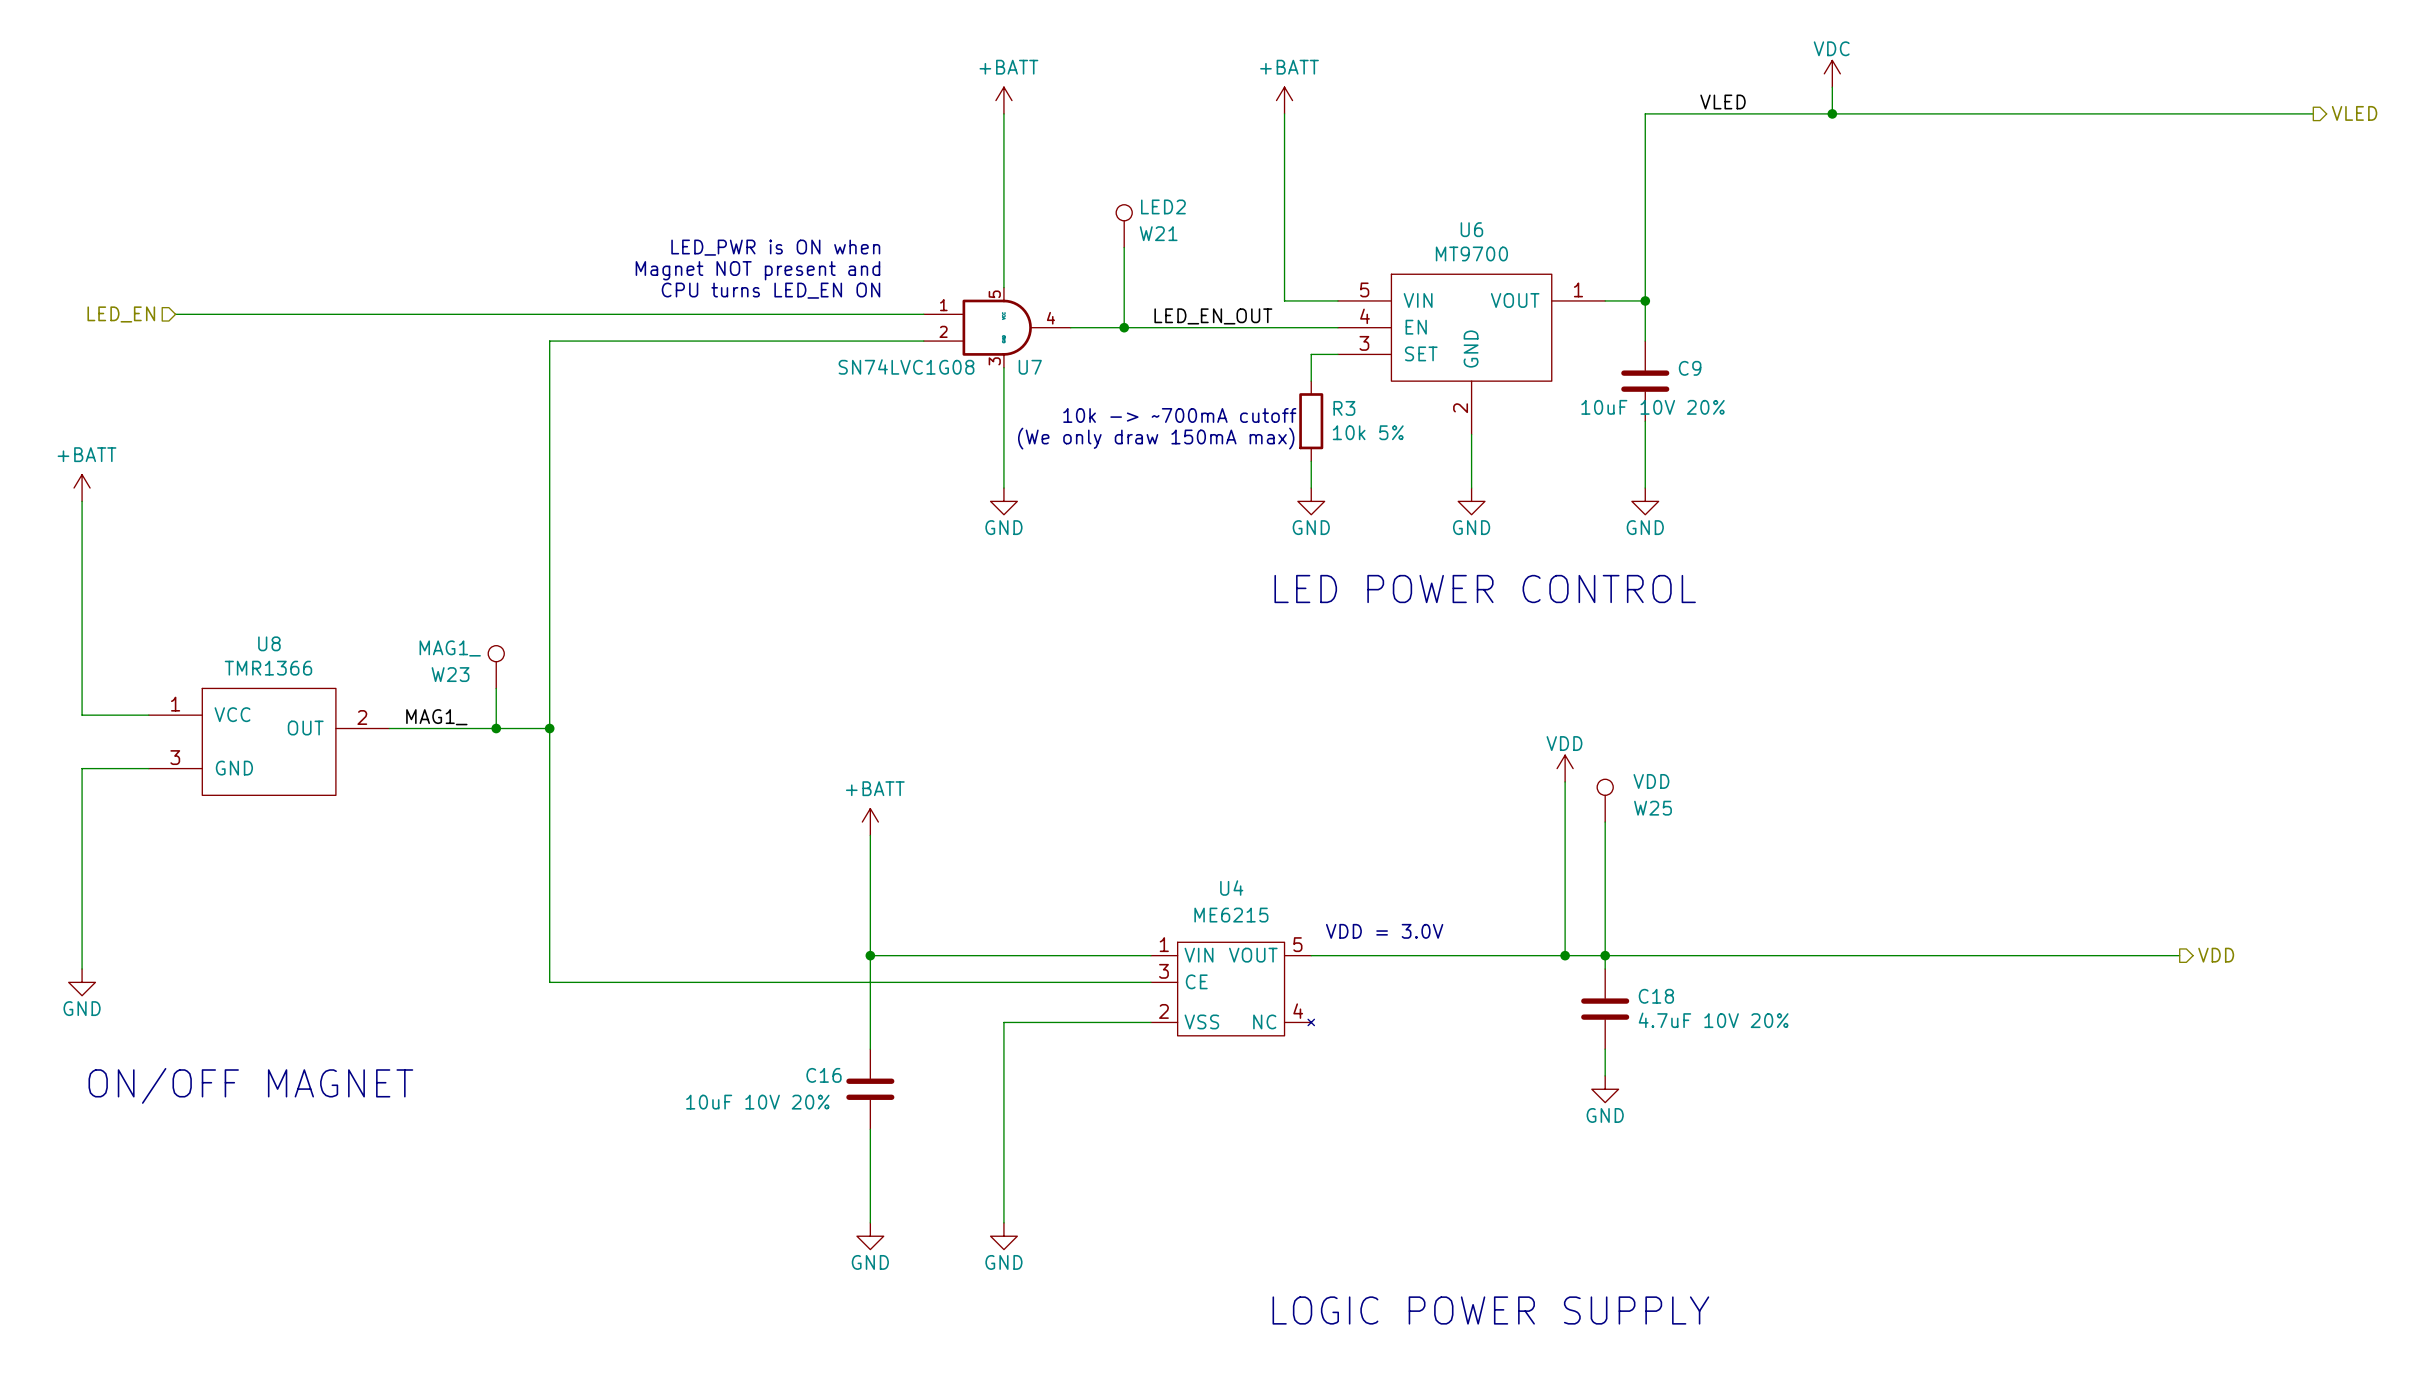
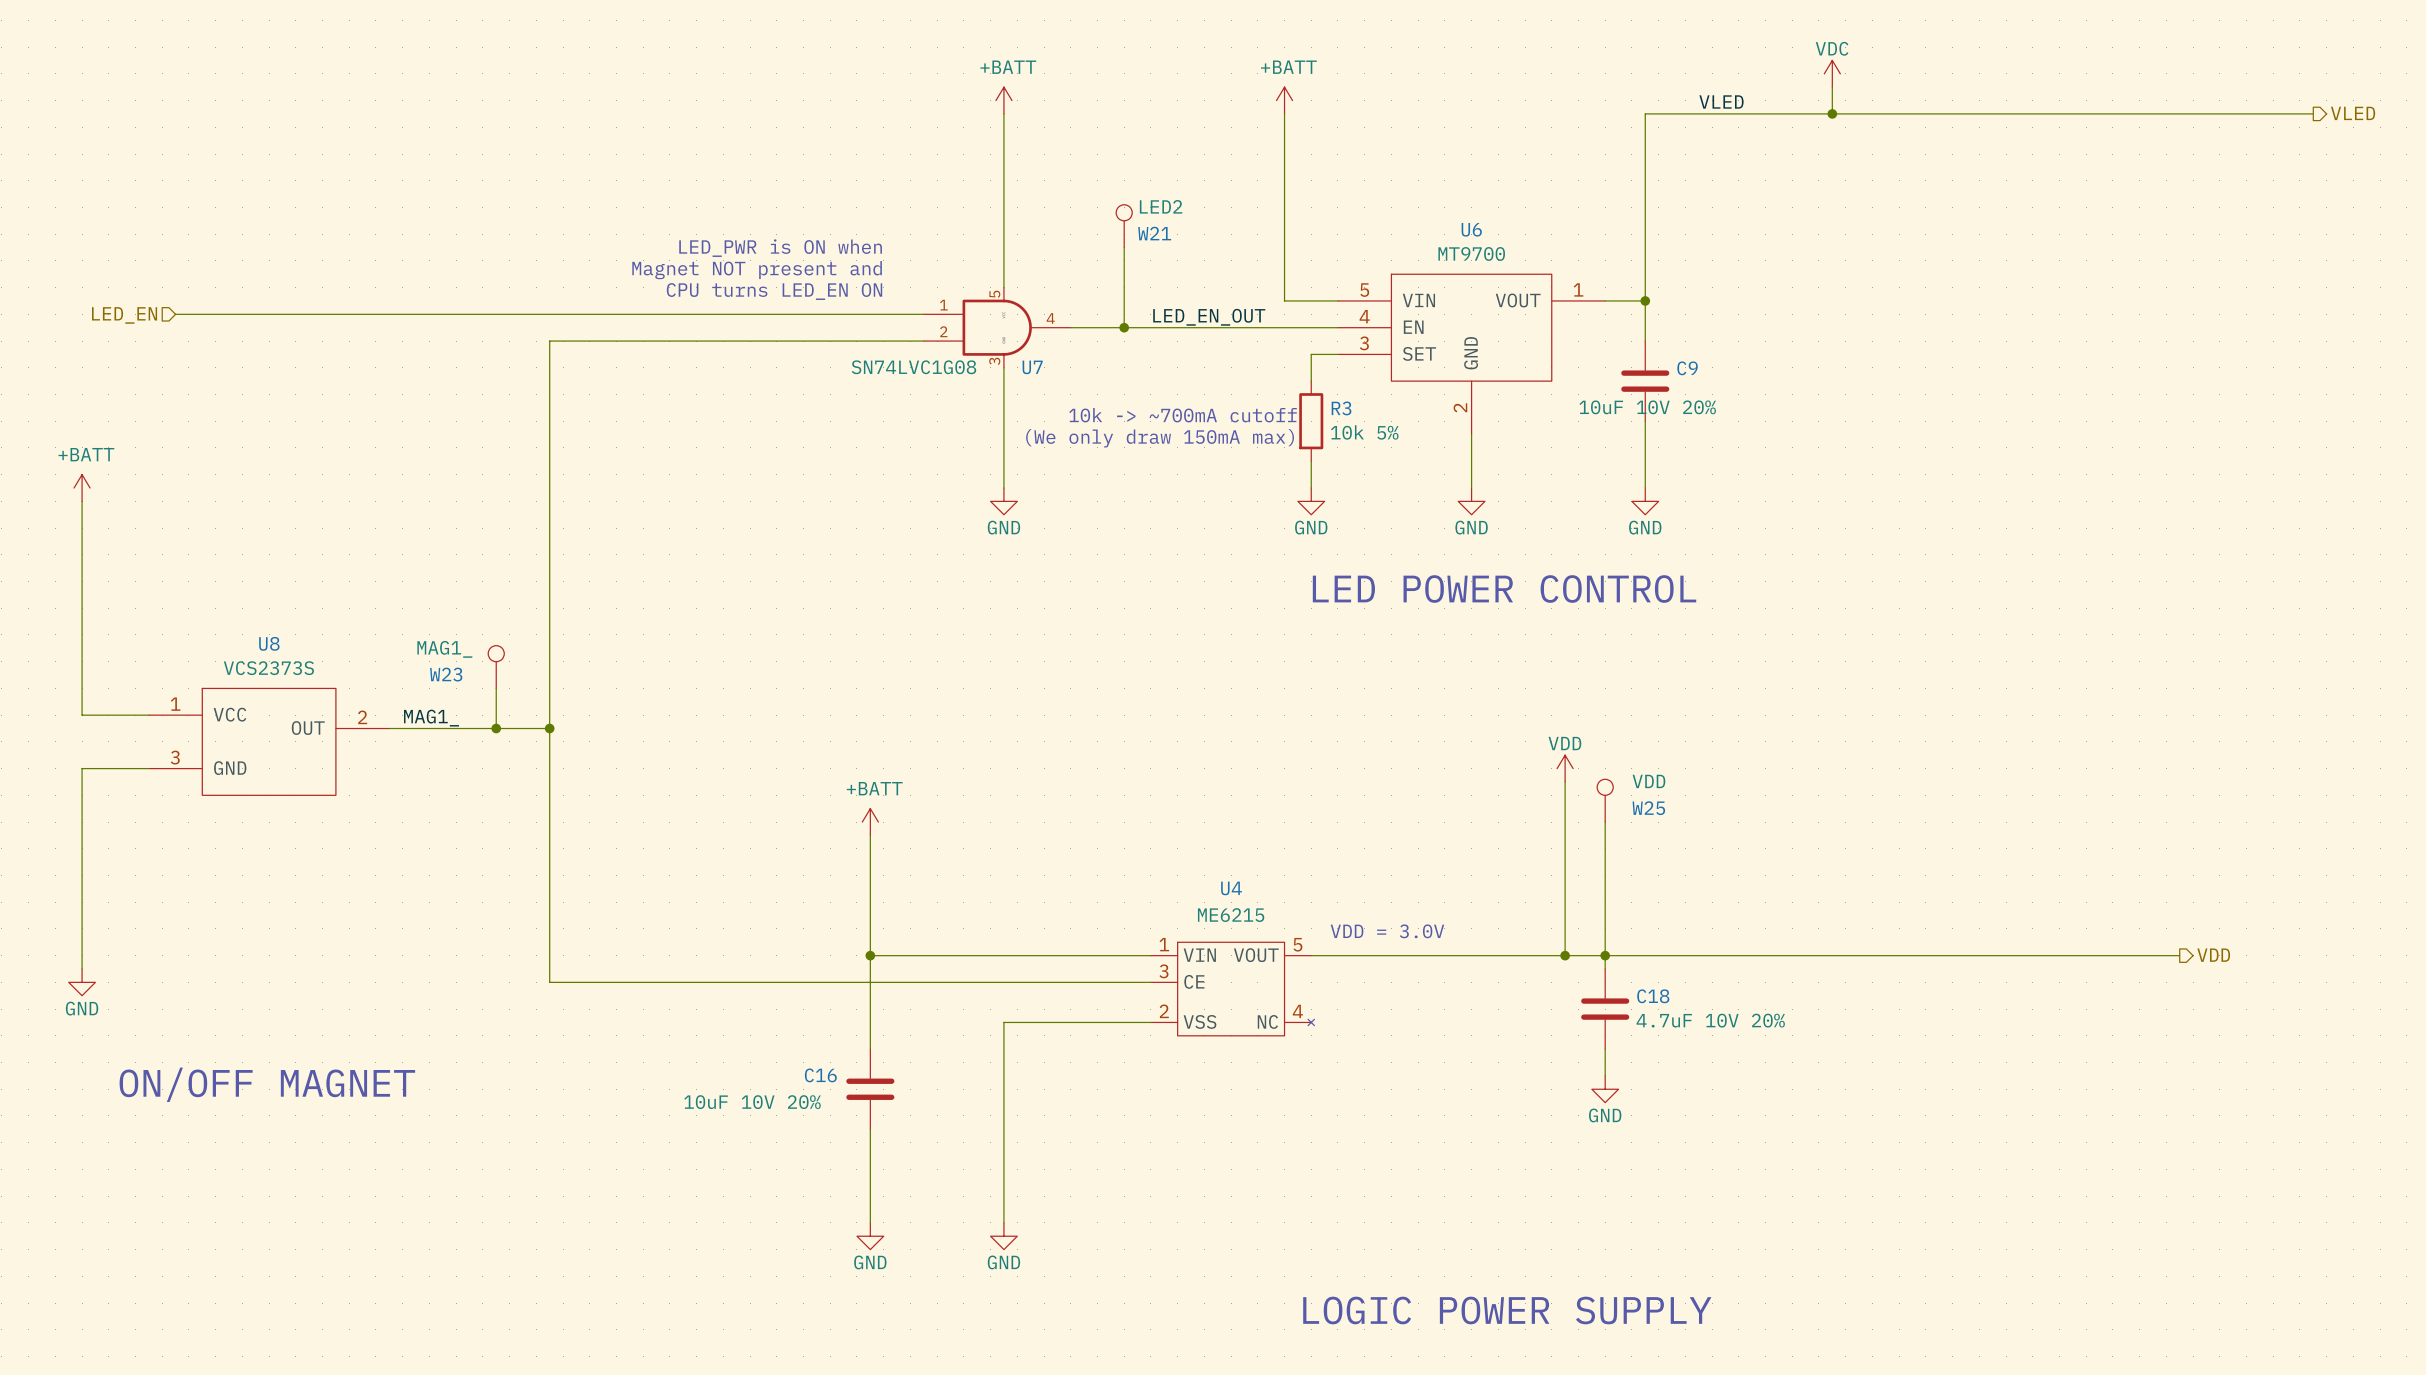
U8 value: TMR1366 (268, 668) -> VCS2373S (268, 668)

